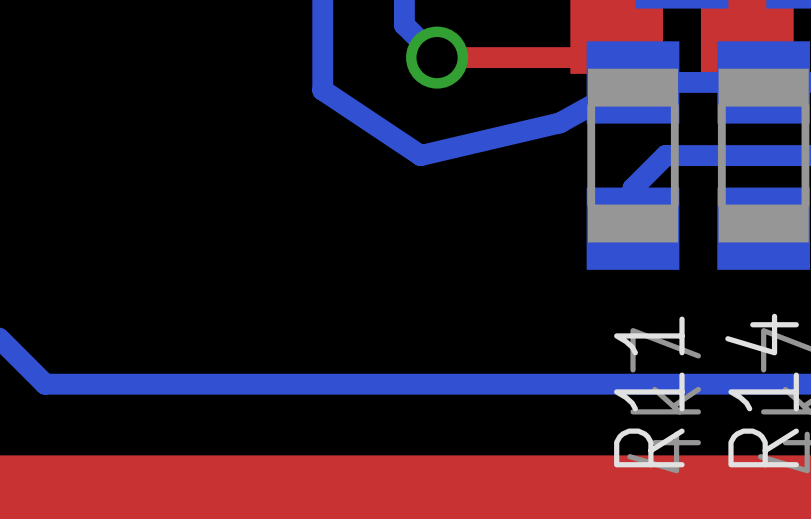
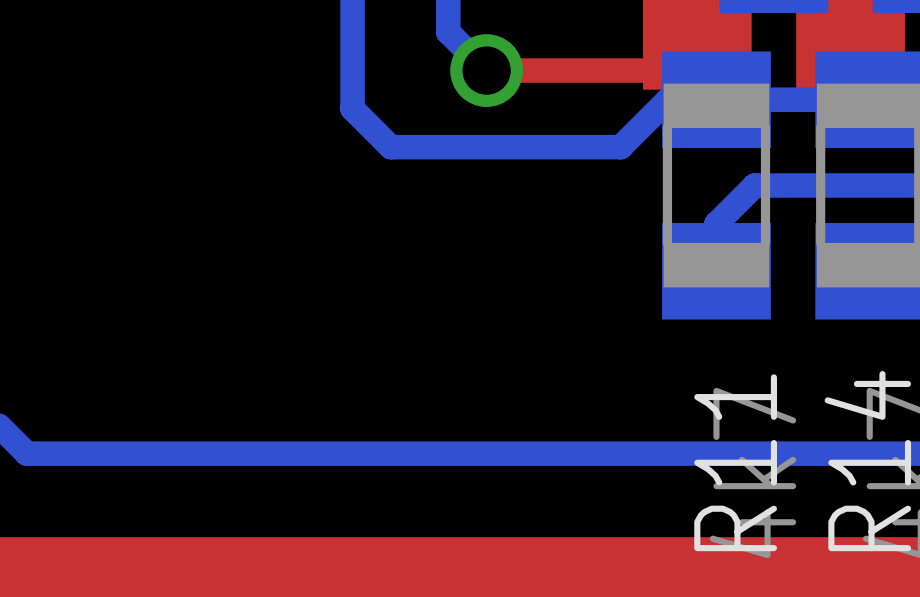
bottom track: (633, 82) (559, 122) (420, 155) (322, 90) -> (716, 99) (668, 99) (620, 147) (390, 147) (352, 108)

